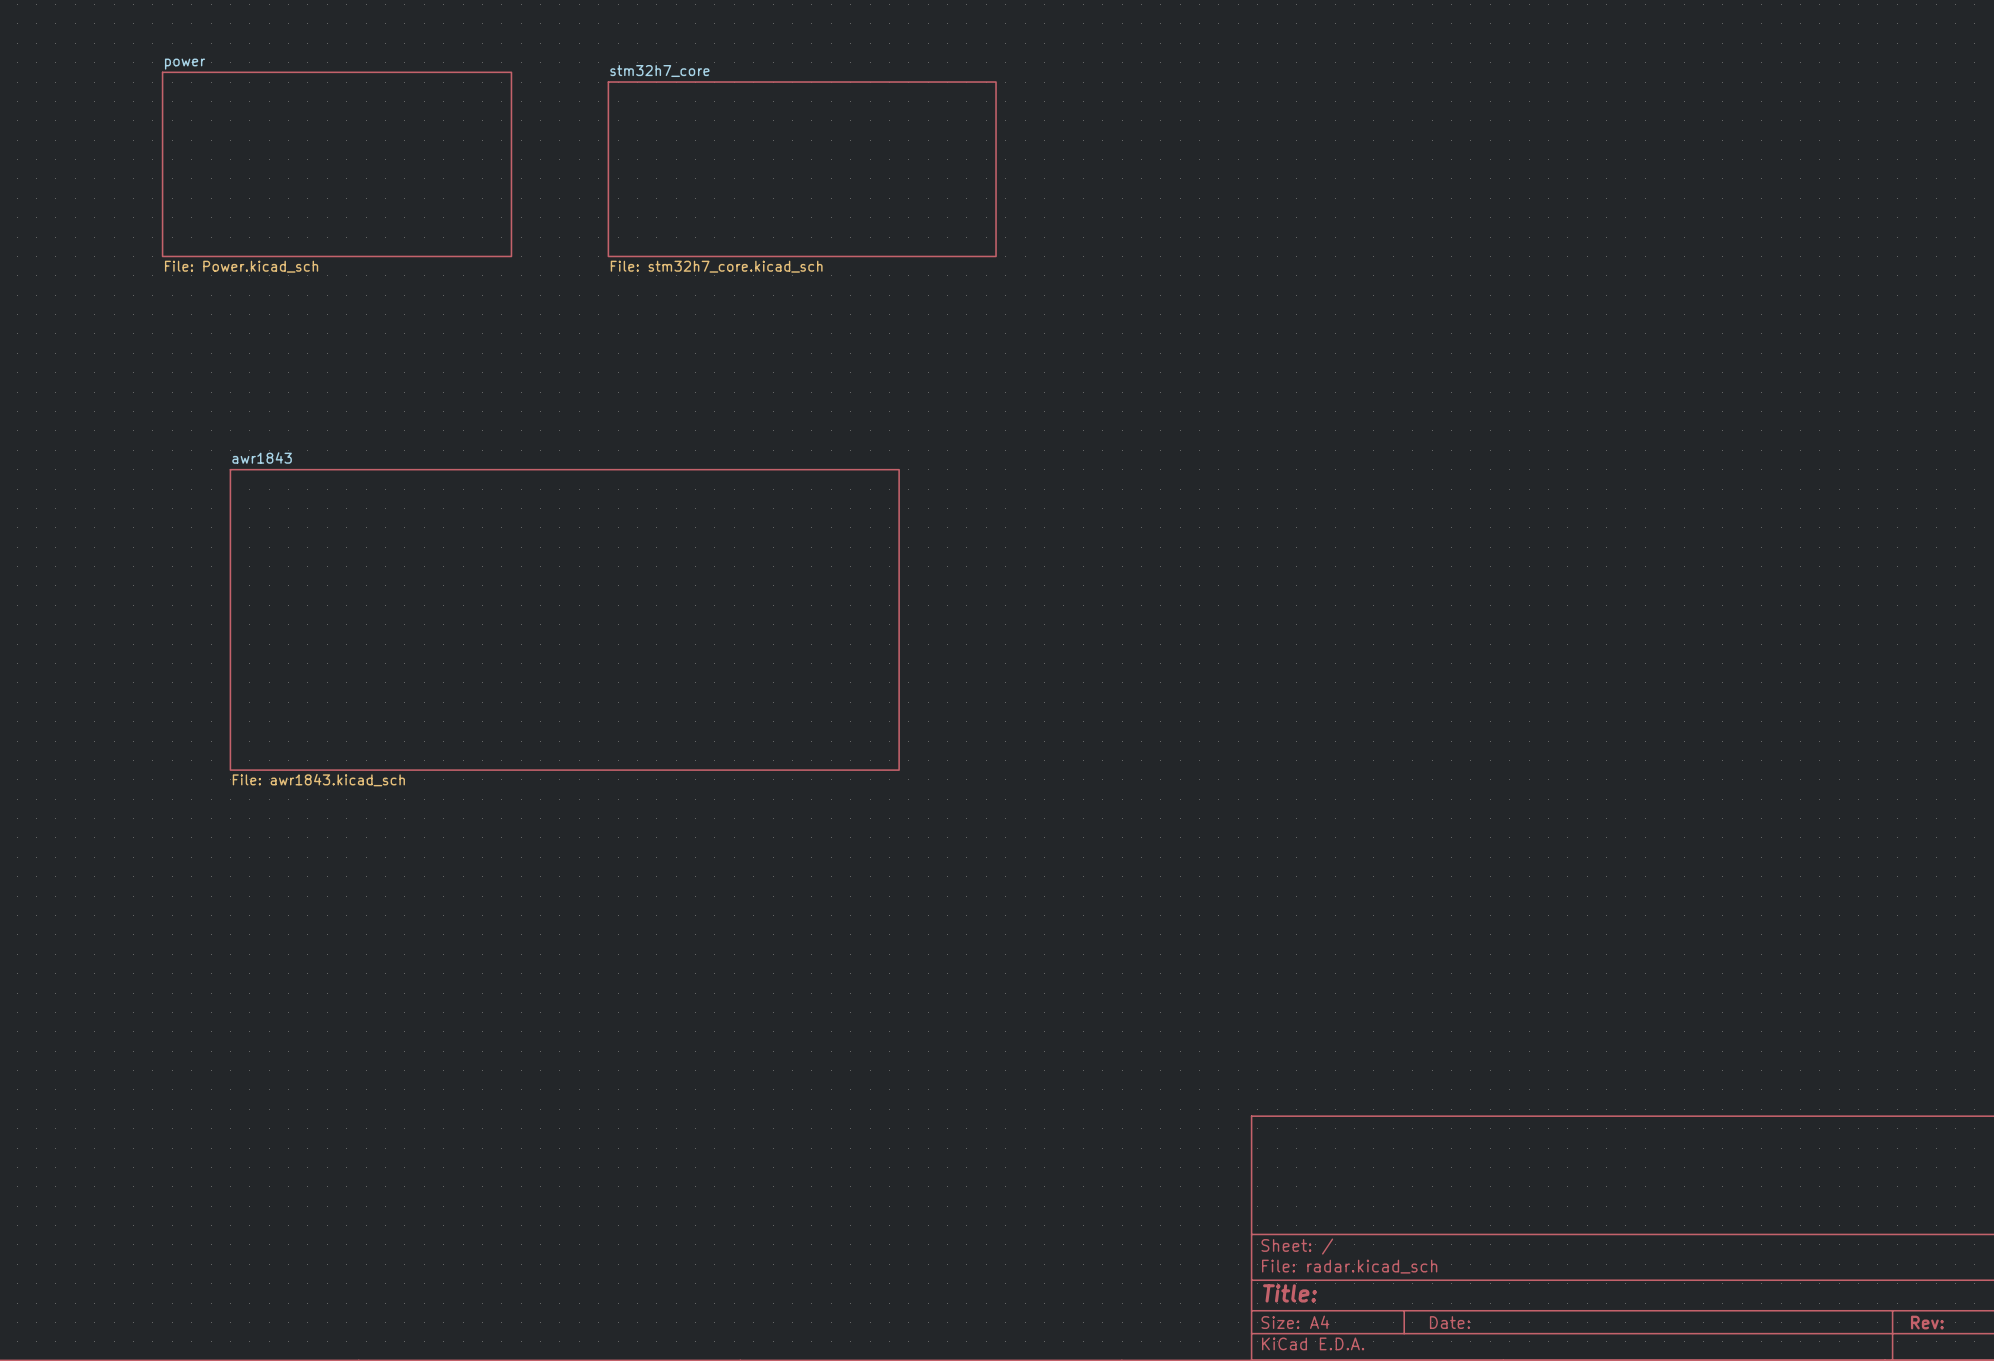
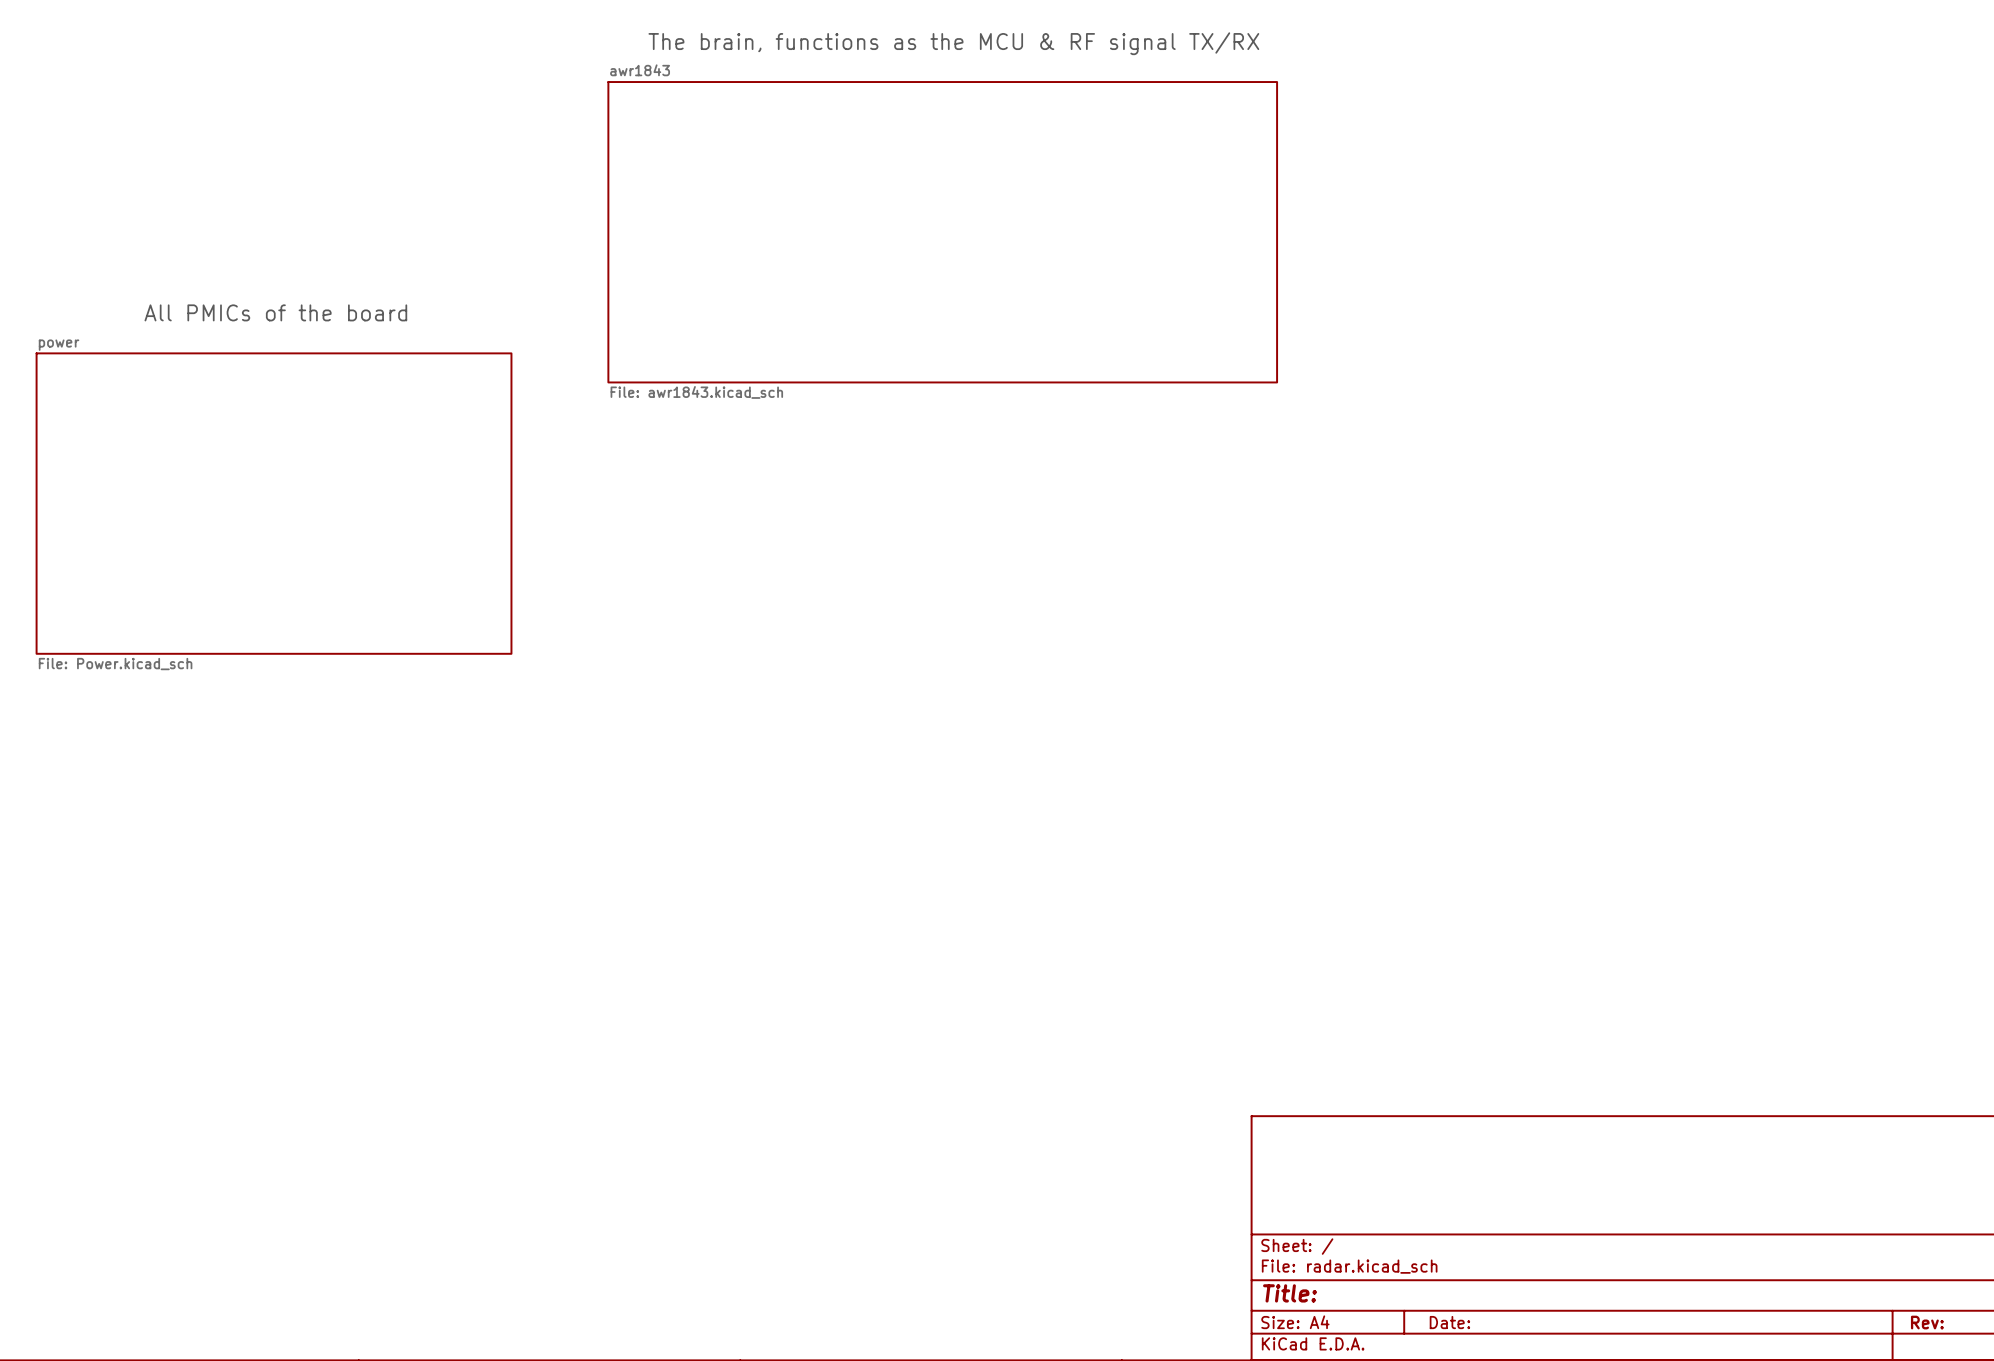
text: none -> The brain, functions as the MCU & RF signal TX/RX (953, 43)
sheet power: File: Power.kicad_sch (337, 164) -> none
sheet stm32h7_core: File: stm32h7_core.kicad_sch (802, 169) -> none
text: none -> All PMICs of the board (275, 312)
sheet power: none -> File: Power.kicad_sch (274, 503)
sheet awr1843 position: (564, 619) -> (942, 232)

